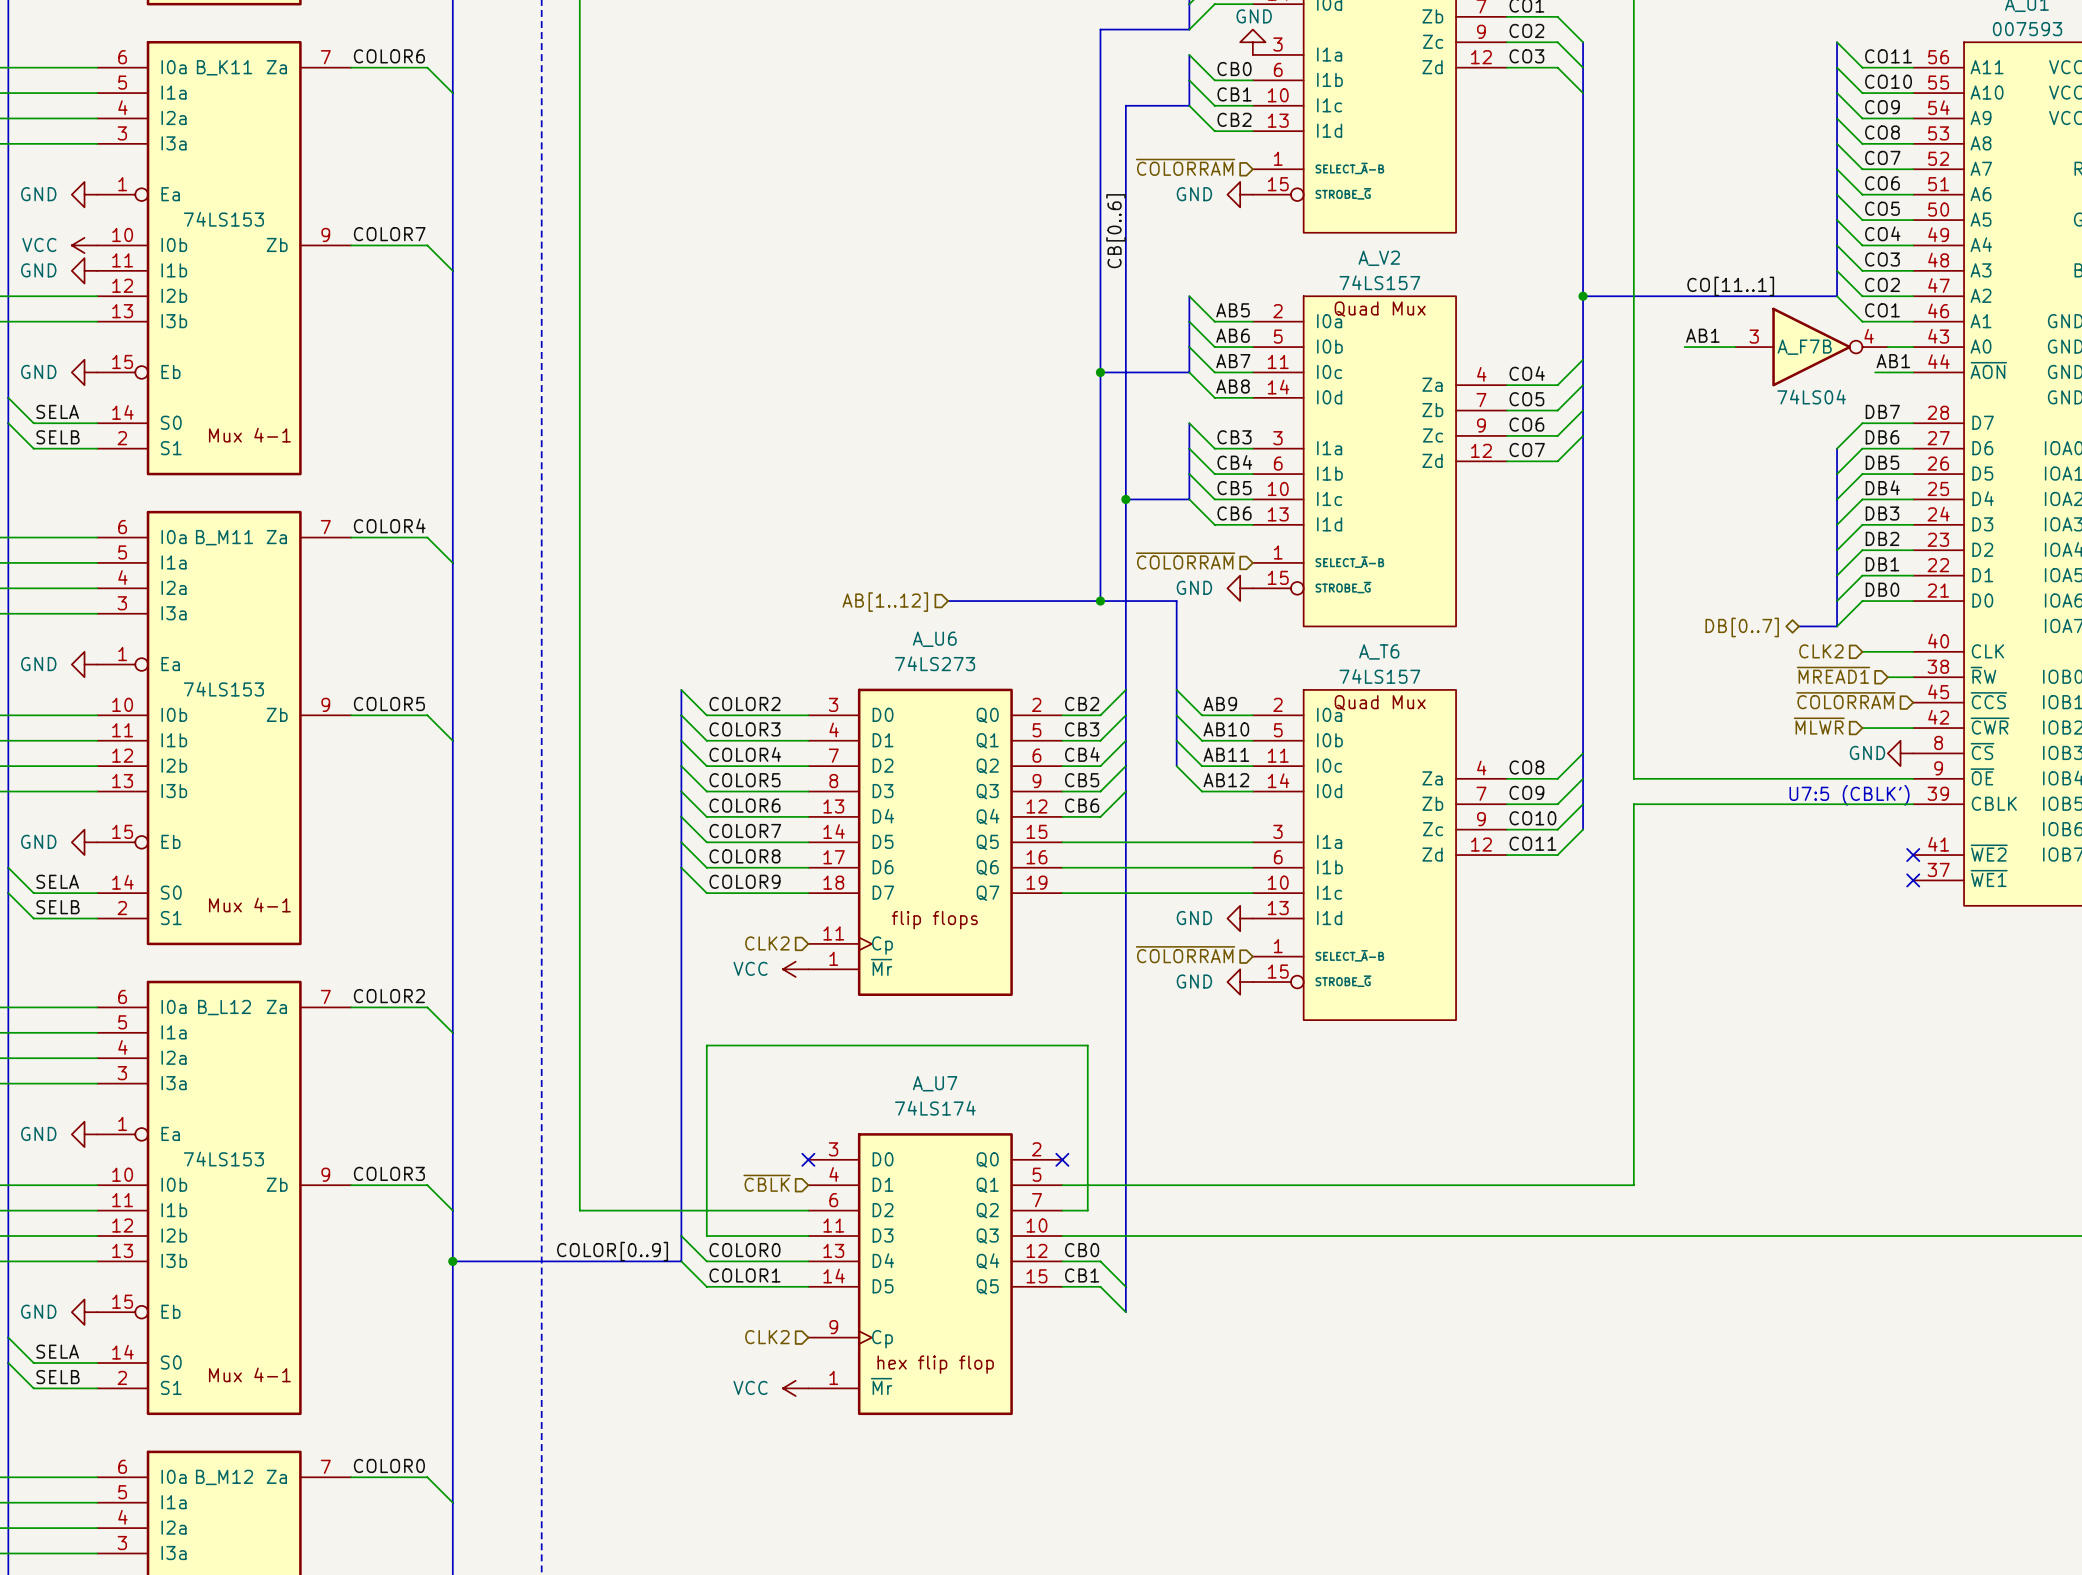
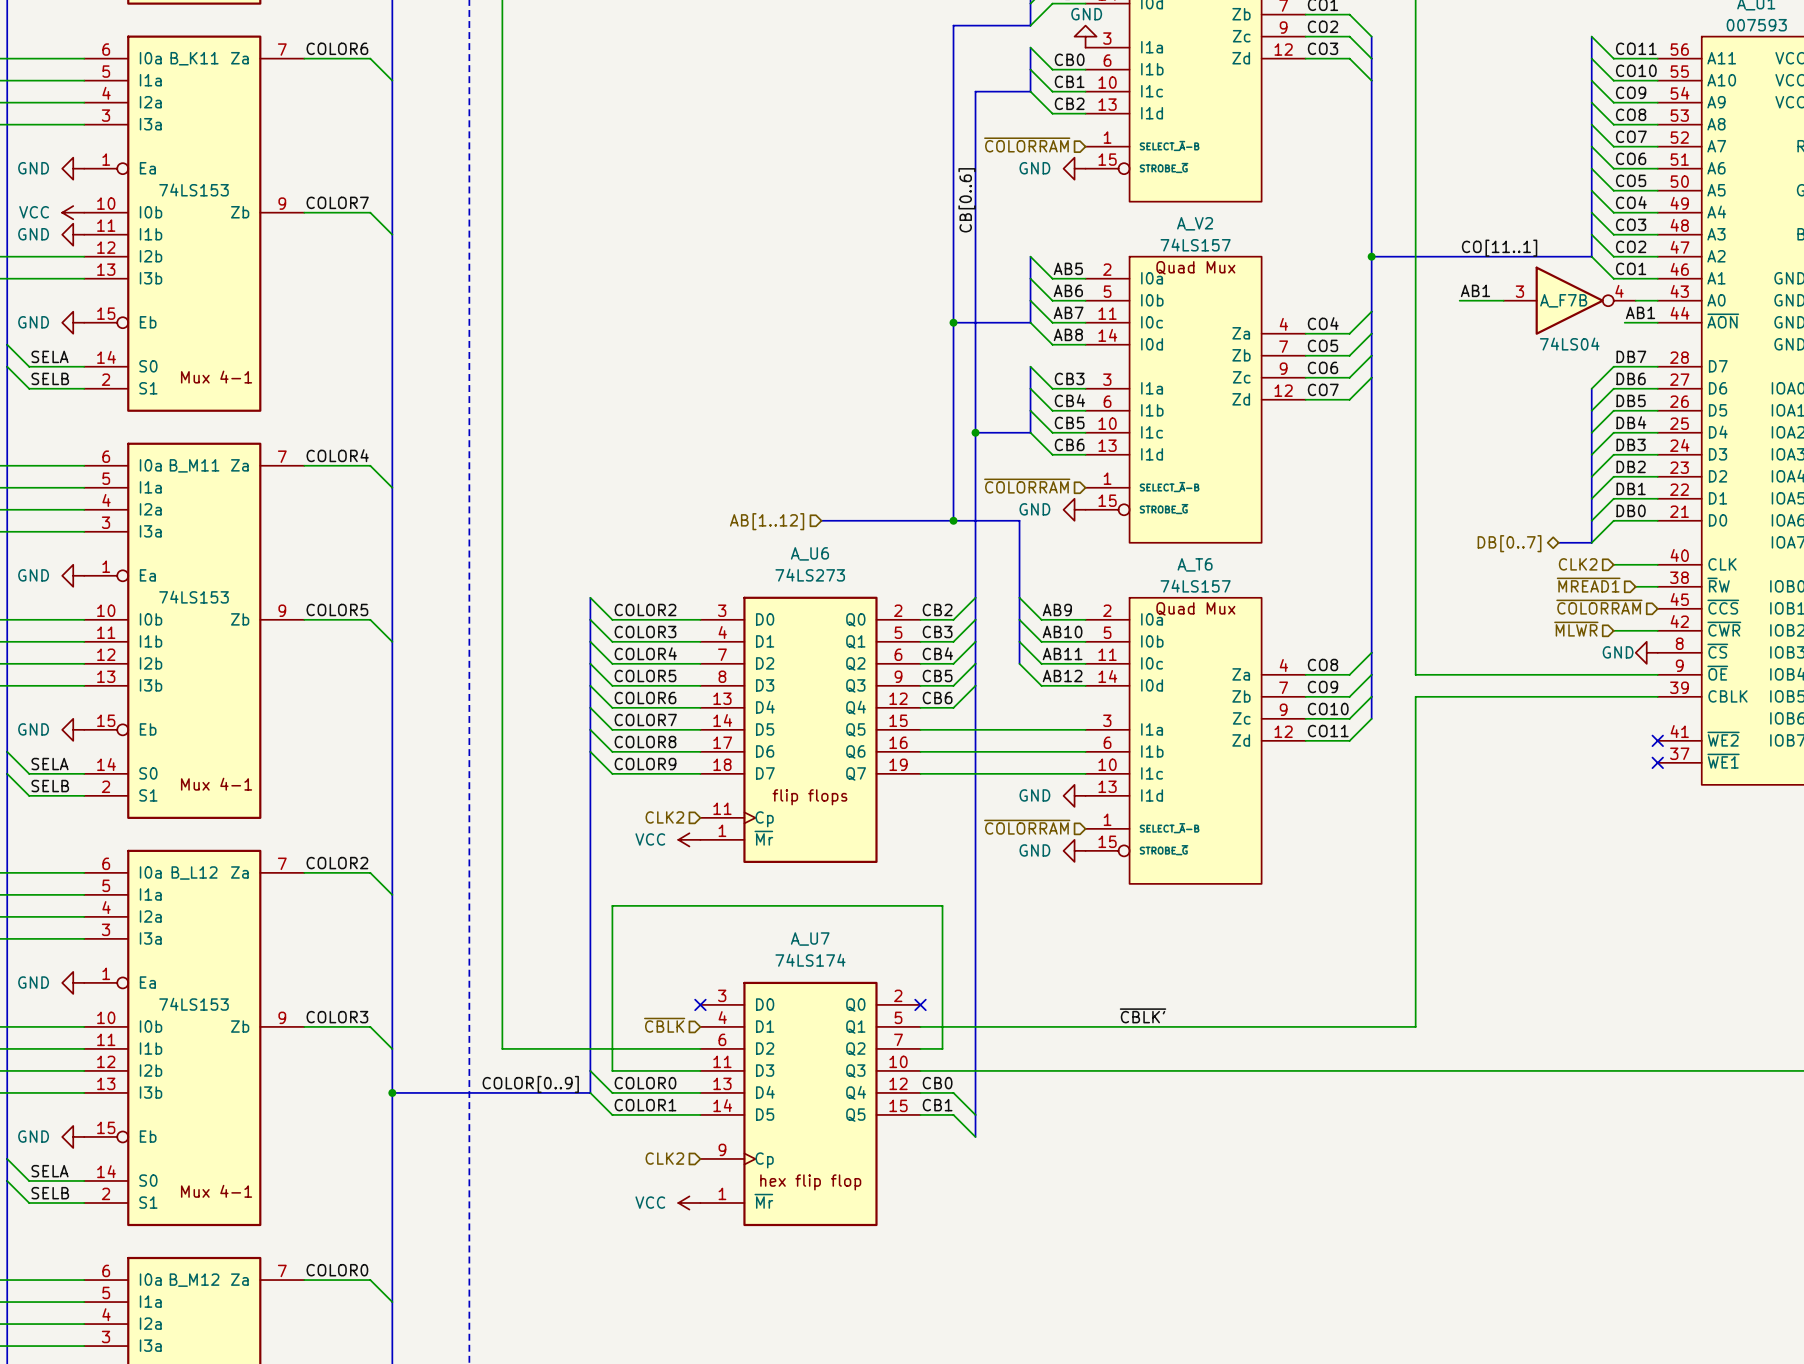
text: U7:5 (CBLK') (1849, 795) -> none
label: none -> ~{CBLK'} (1143, 1015)

